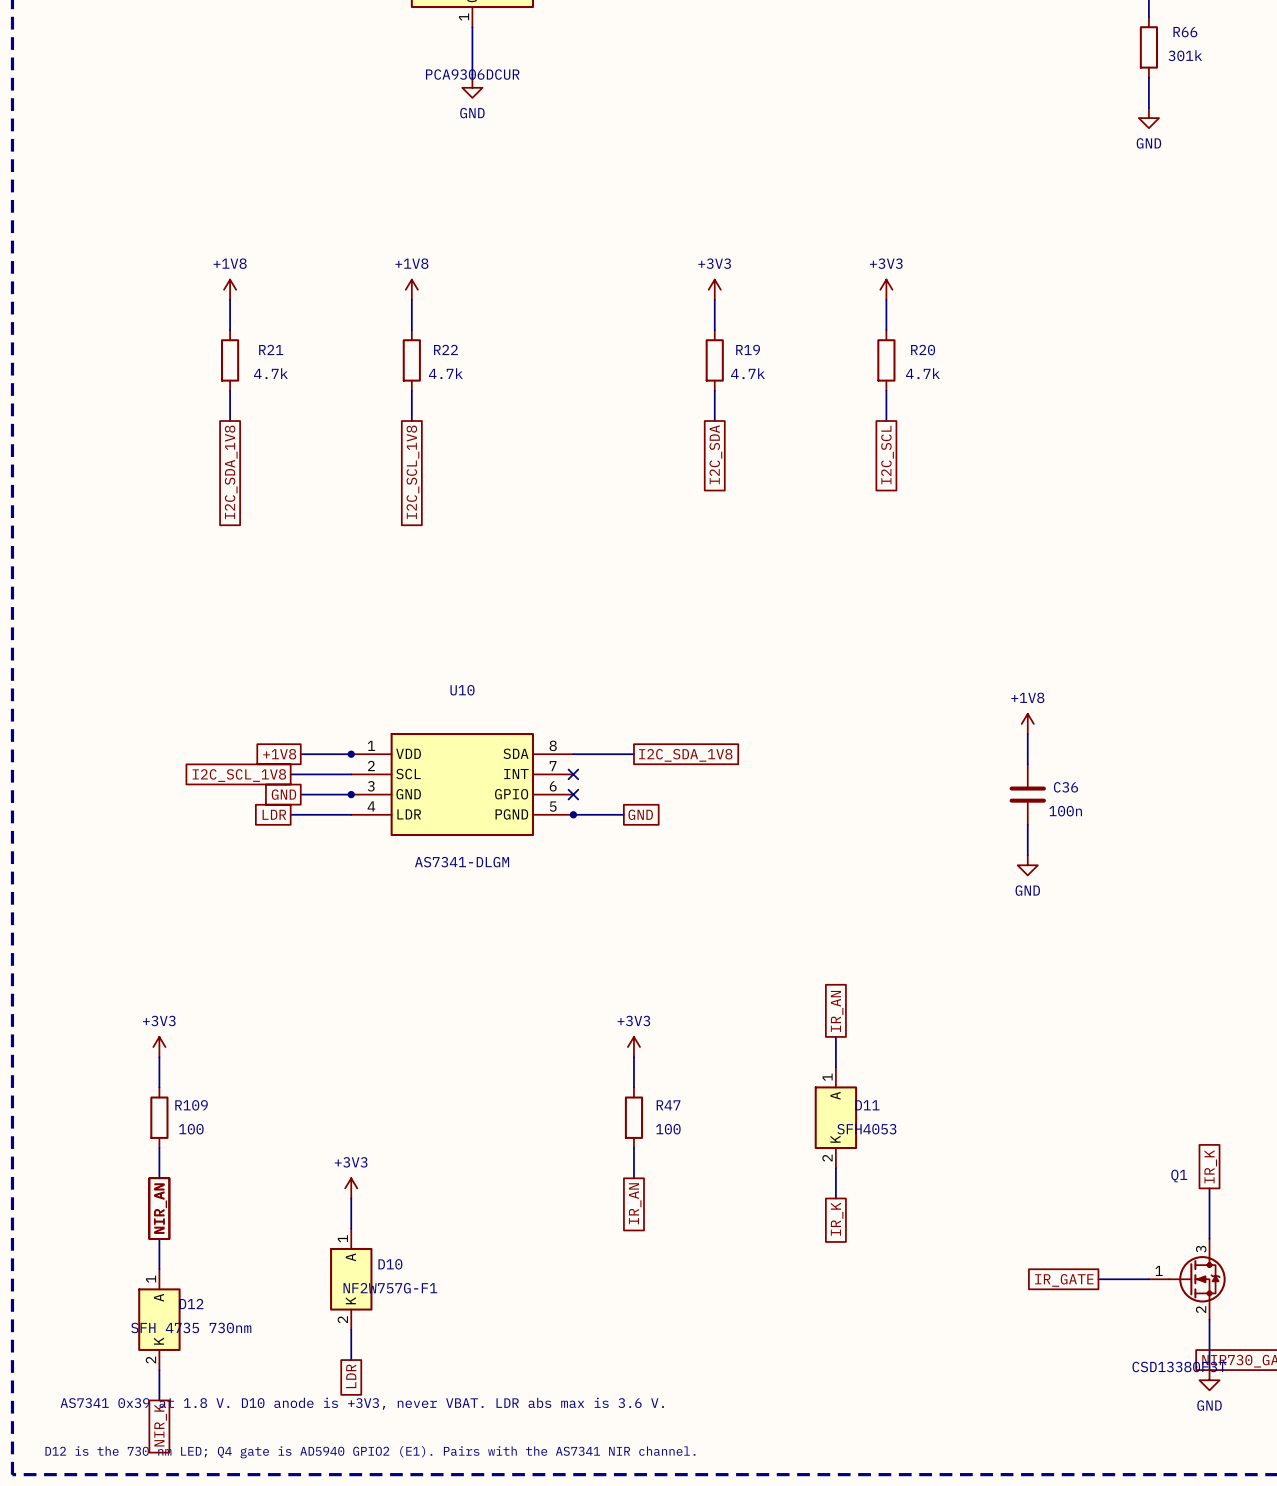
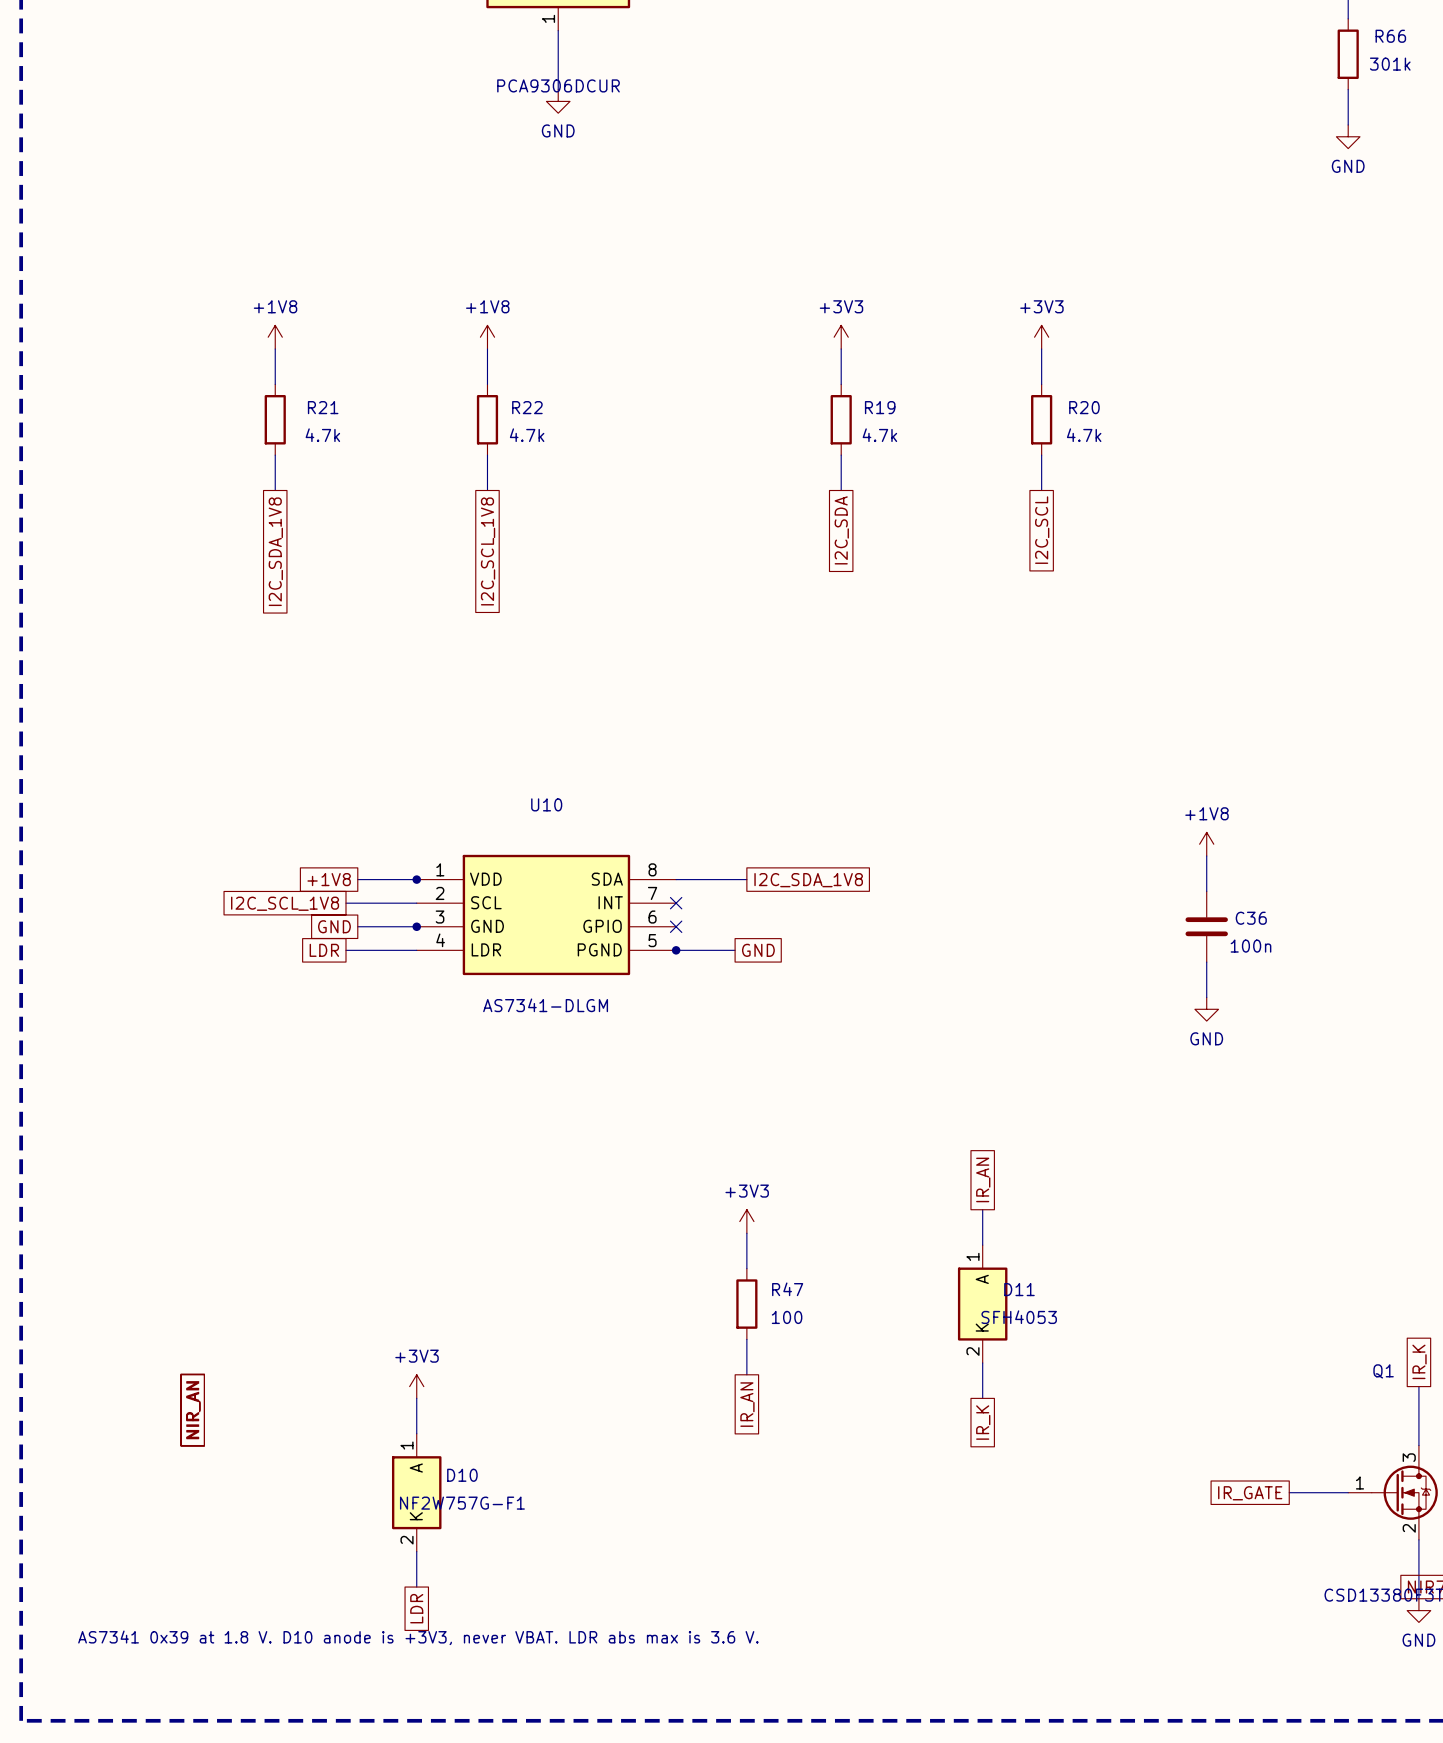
power symbol: +3V3 (159, 1047) -> none
wire: (159, 1057) (159, 1087) -> none
R109: 100 (159, 1117) -> none
wire: (159, 1148) (159, 1178) -> none
wire: (159, 1238) (159, 1269) -> none
D12: SFH 4735 730nm (159, 1319) -> none
wire: (159, 1370) (159, 1400) -> none
global label: NIR_K (160, 1425) -> none
text: D12 is the 730 nm LED; Q4 gate is AD5940 GPIO2 (E1). Pairs with the AS7341 NIR channel. (370, 1452) -> none

